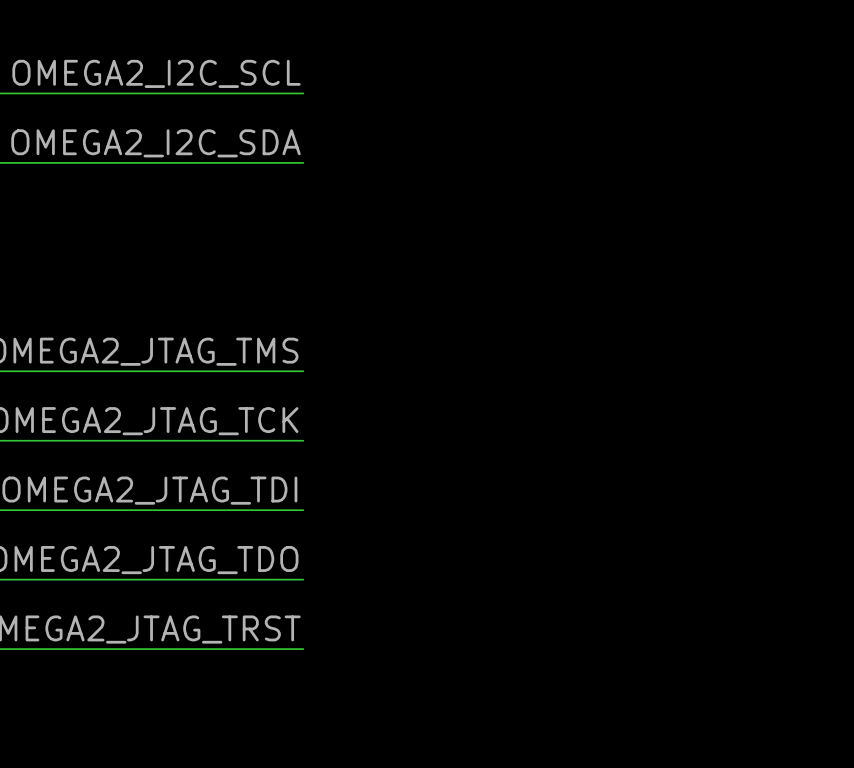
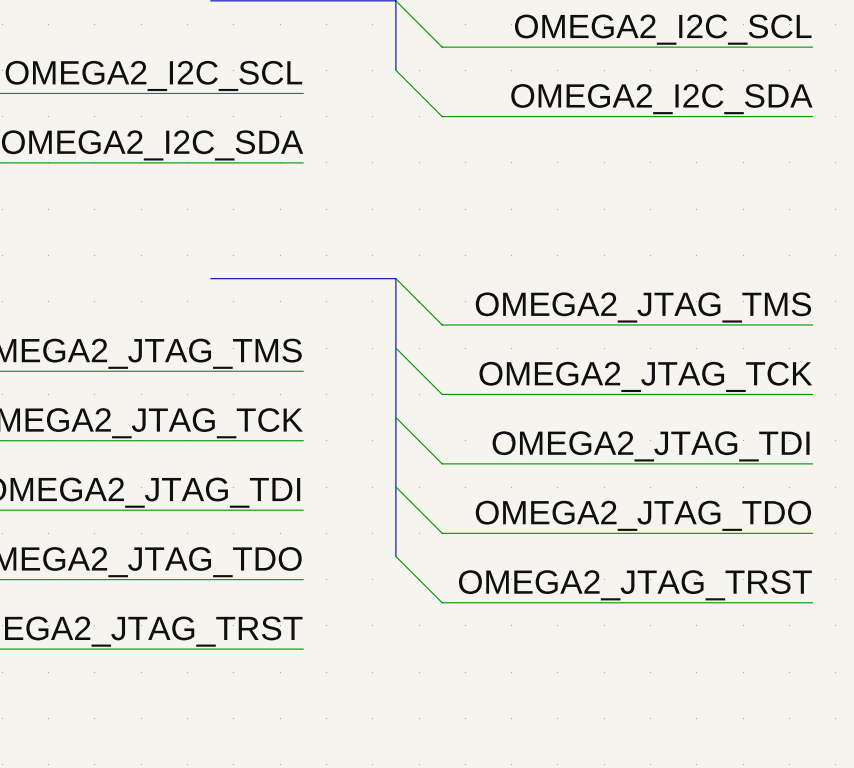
bus: none -> (210, 0) (395, 0) (395, 70)
wire: none -> (395, 0) (442, 47) (812, 47)
label: none -> OMEGA2_I2C_SCL (663, 29)
wire: none -> (395, 70) (442, 116) (812, 116)
label: none -> OMEGA2_I2C_SDA (661, 99)
bus: none -> (210, 278) (395, 278) (395, 556)
wire: none -> (395, 278) (442, 324) (812, 324)
label: none -> OMEGA2_JTAG_TMS (643, 307)
wire: none -> (395, 348) (442, 394) (812, 394)
label: none -> OMEGA2_JTAG_TCK (645, 376)
wire: none -> (395, 417) (442, 463) (812, 463)
label: none -> OMEGA2_JTAG_TDI (651, 446)
wire: none -> (395, 487) (442, 533) (812, 533)
label: none -> OMEGA2_JTAG_TDO (643, 515)
wire: none -> (395, 556) (442, 602) (812, 602)
label: none -> OMEGA2_JTAG_TRST (635, 585)

